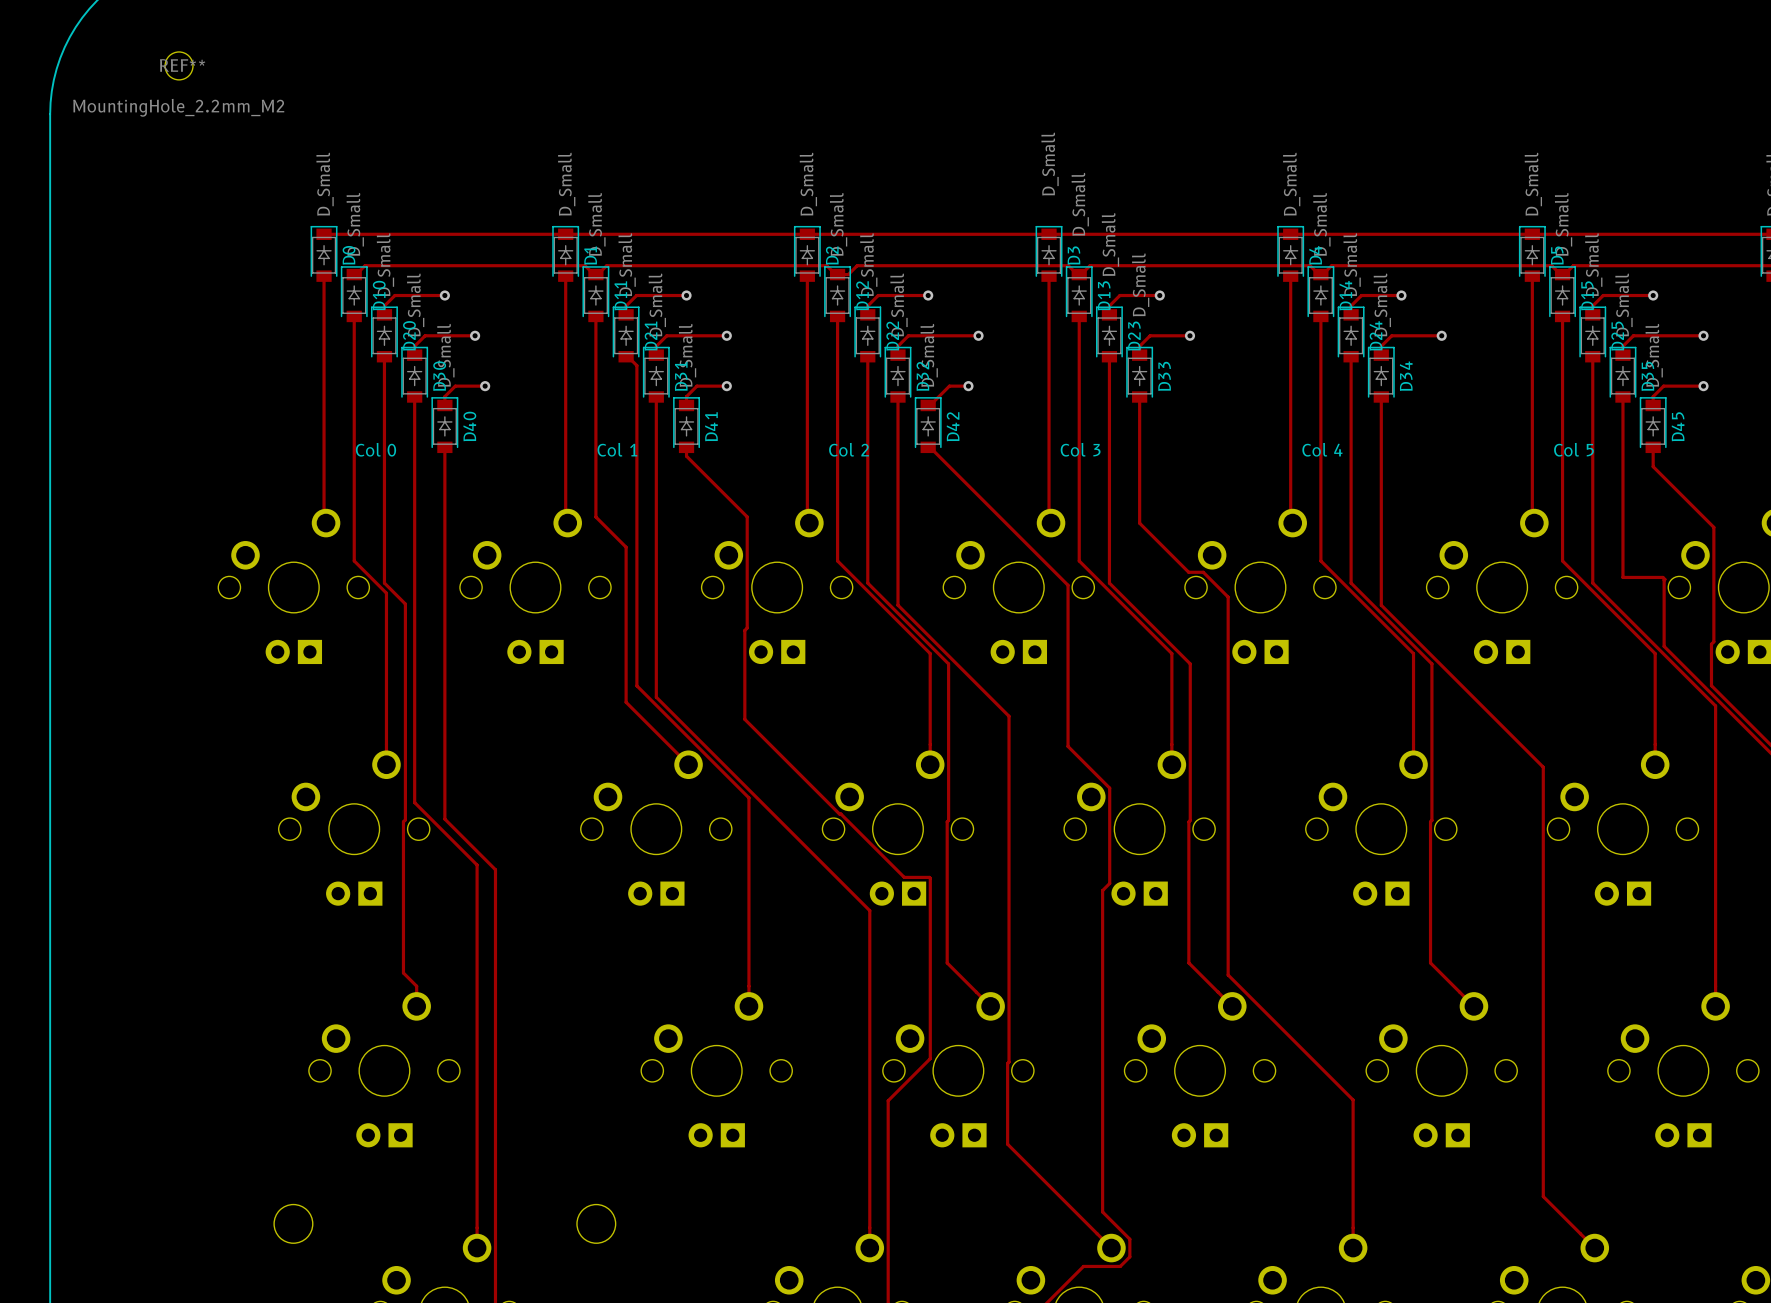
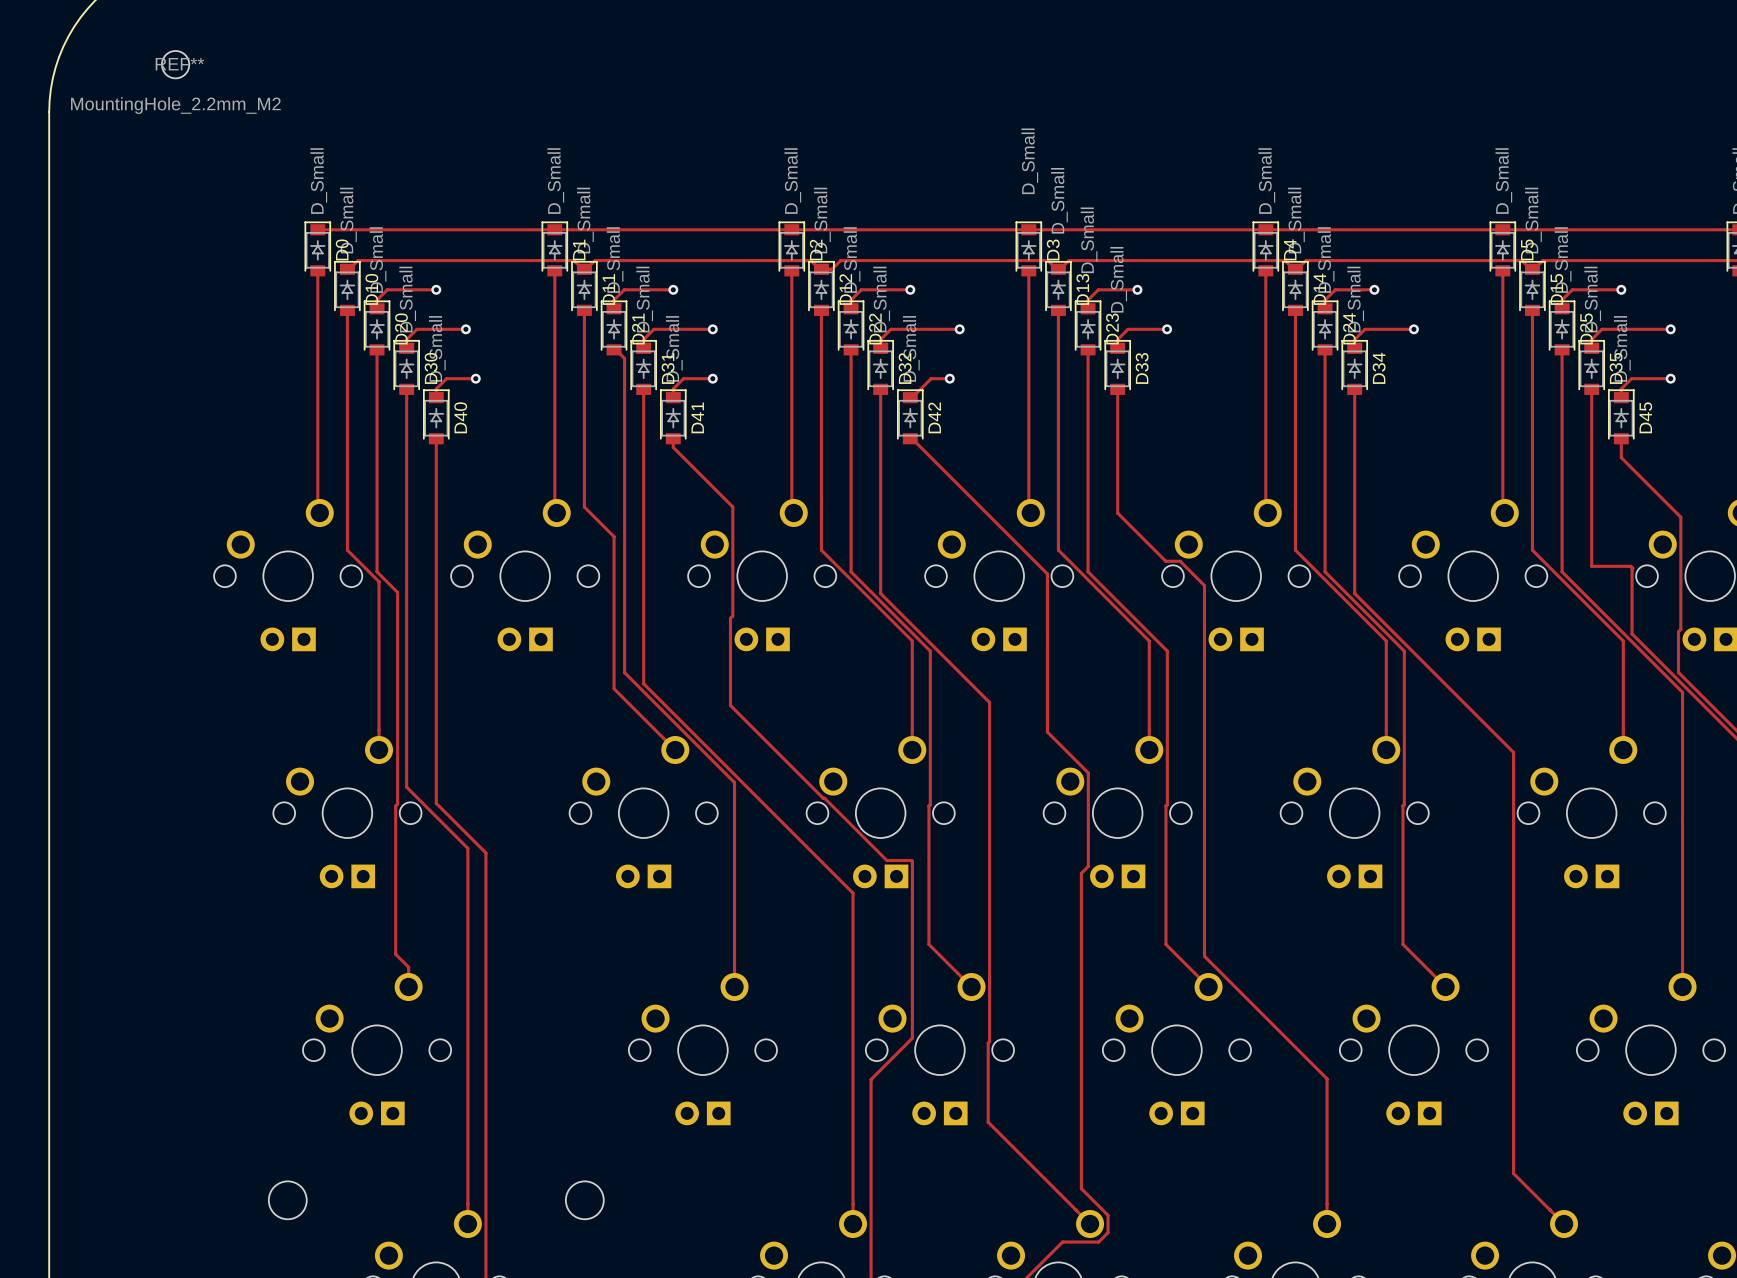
text: Col 0 (375, 449) -> none
text: Col 1 (617, 449) -> none
text: Col 2 (849, 449) -> none
text: Col 3 (1080, 449) -> none
text: Col 4 (1322, 449) -> none
text: Col 5 (1573, 449) -> none

